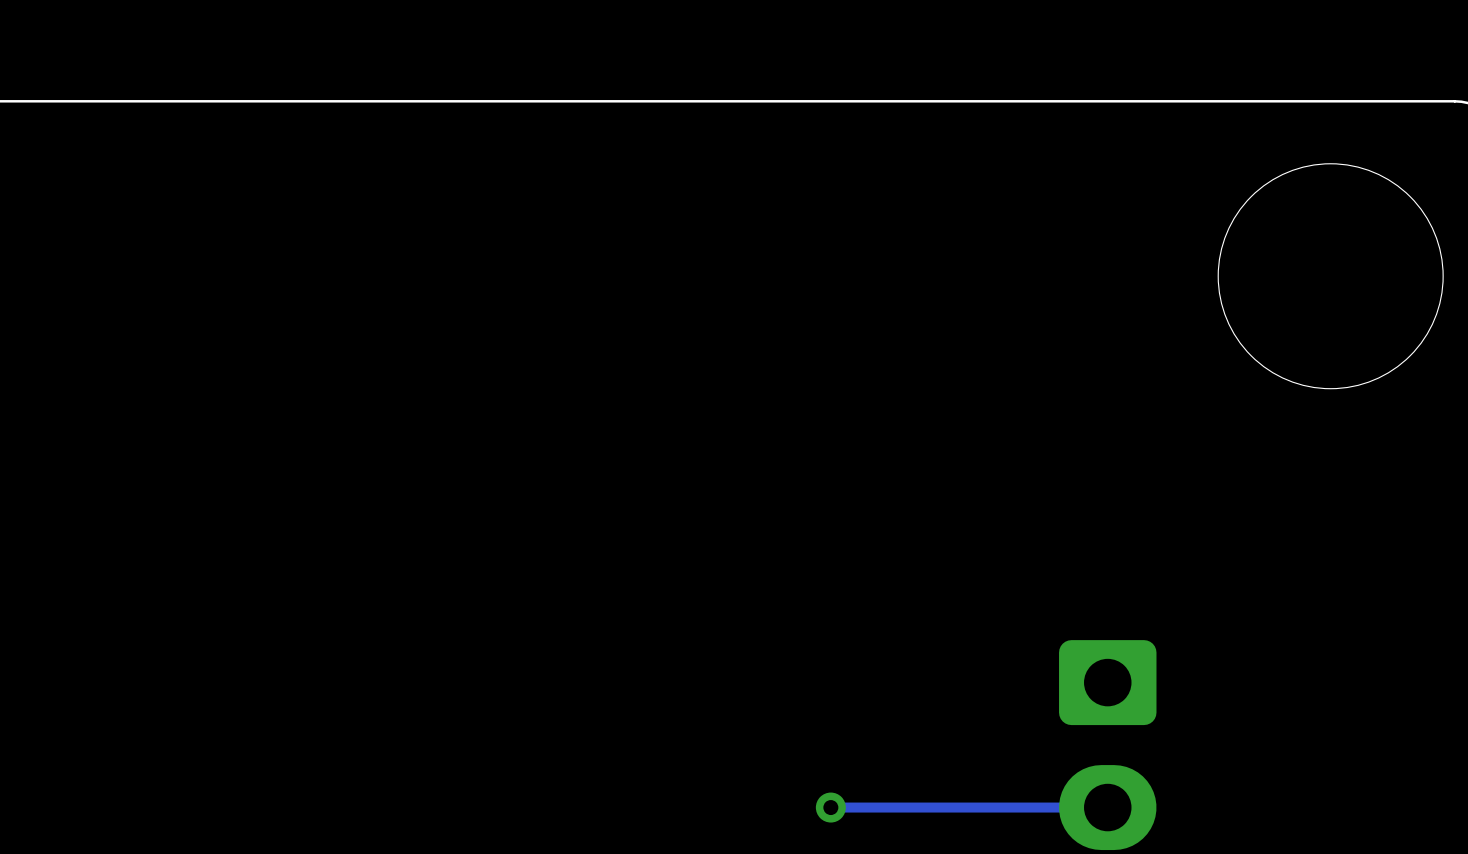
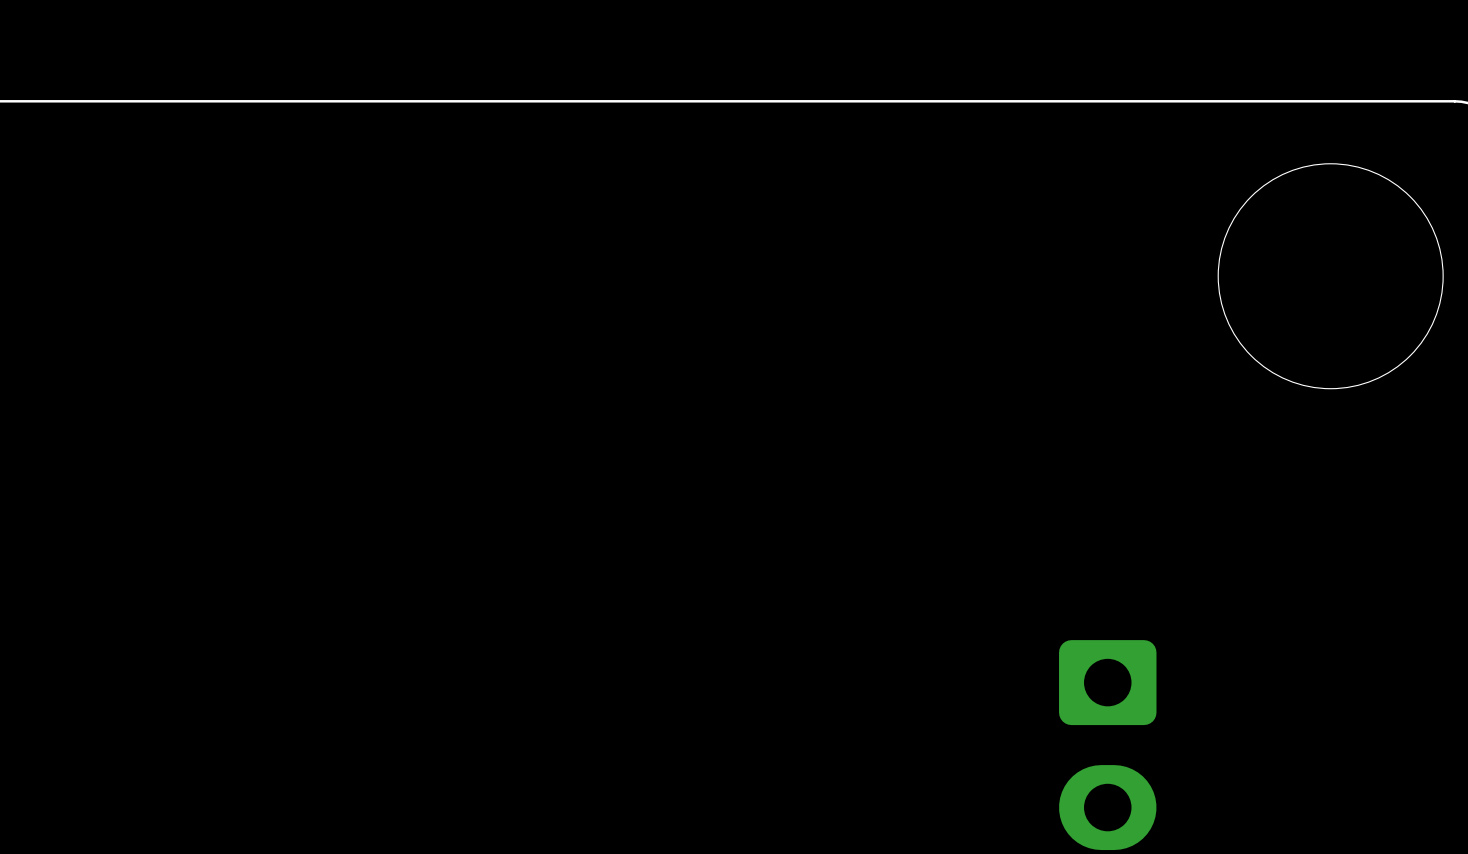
via: (830, 807) -> none
track: (1107, 807) (824, 807) -> none

